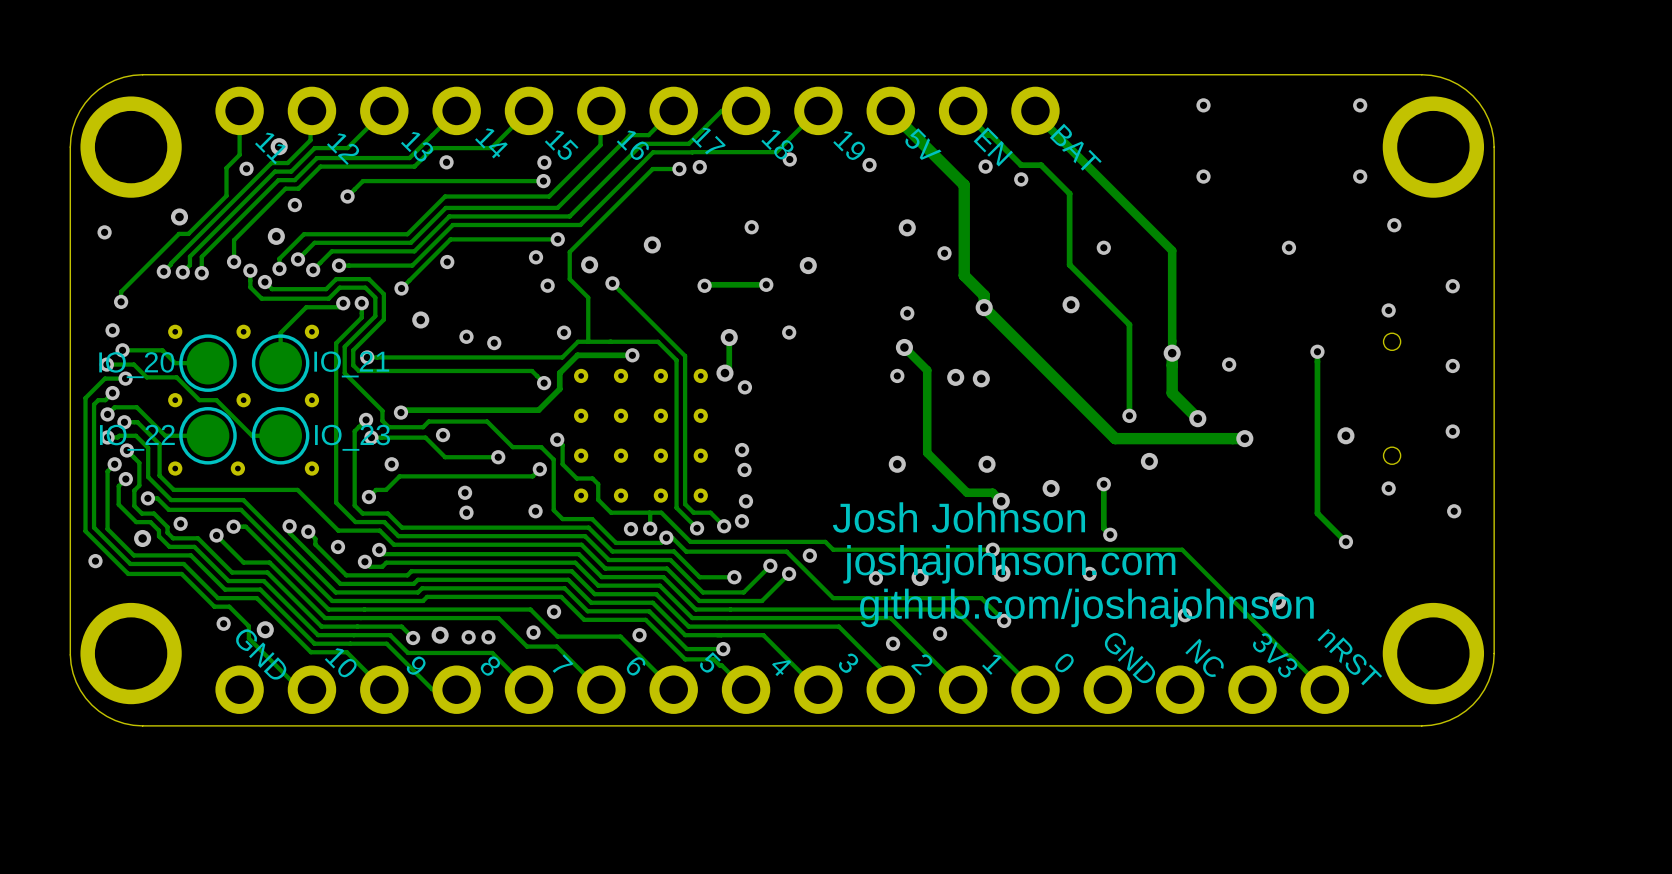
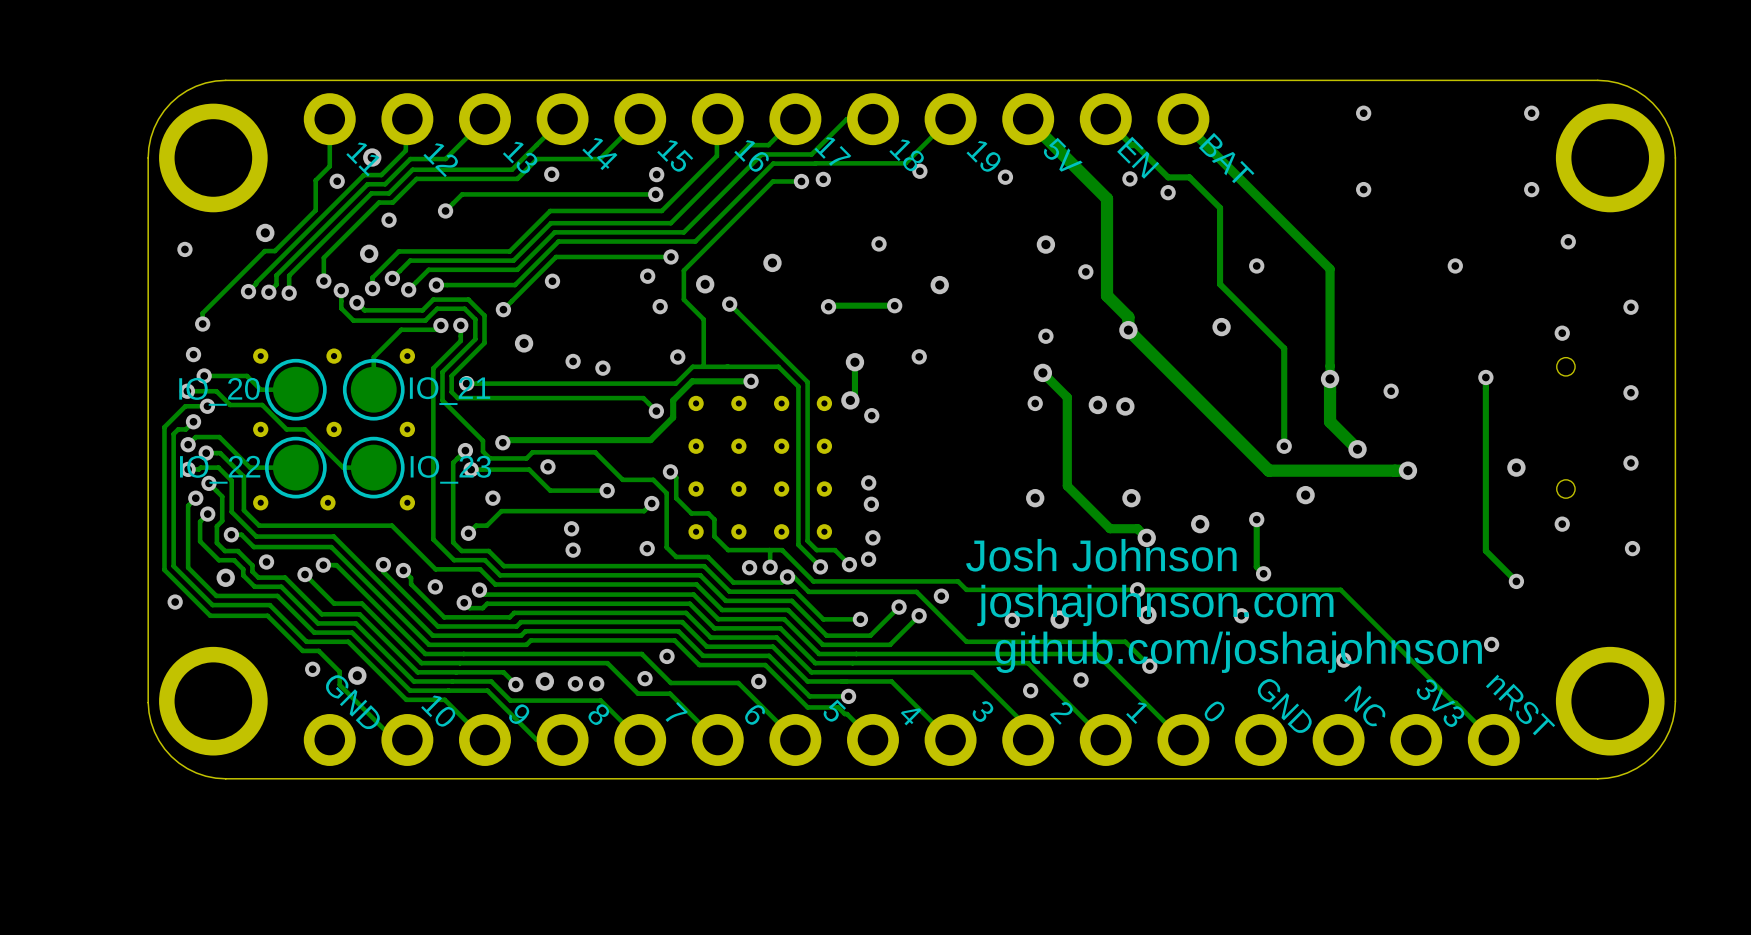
via: (1277, 600) -> none
via: none -> (1491, 644)

